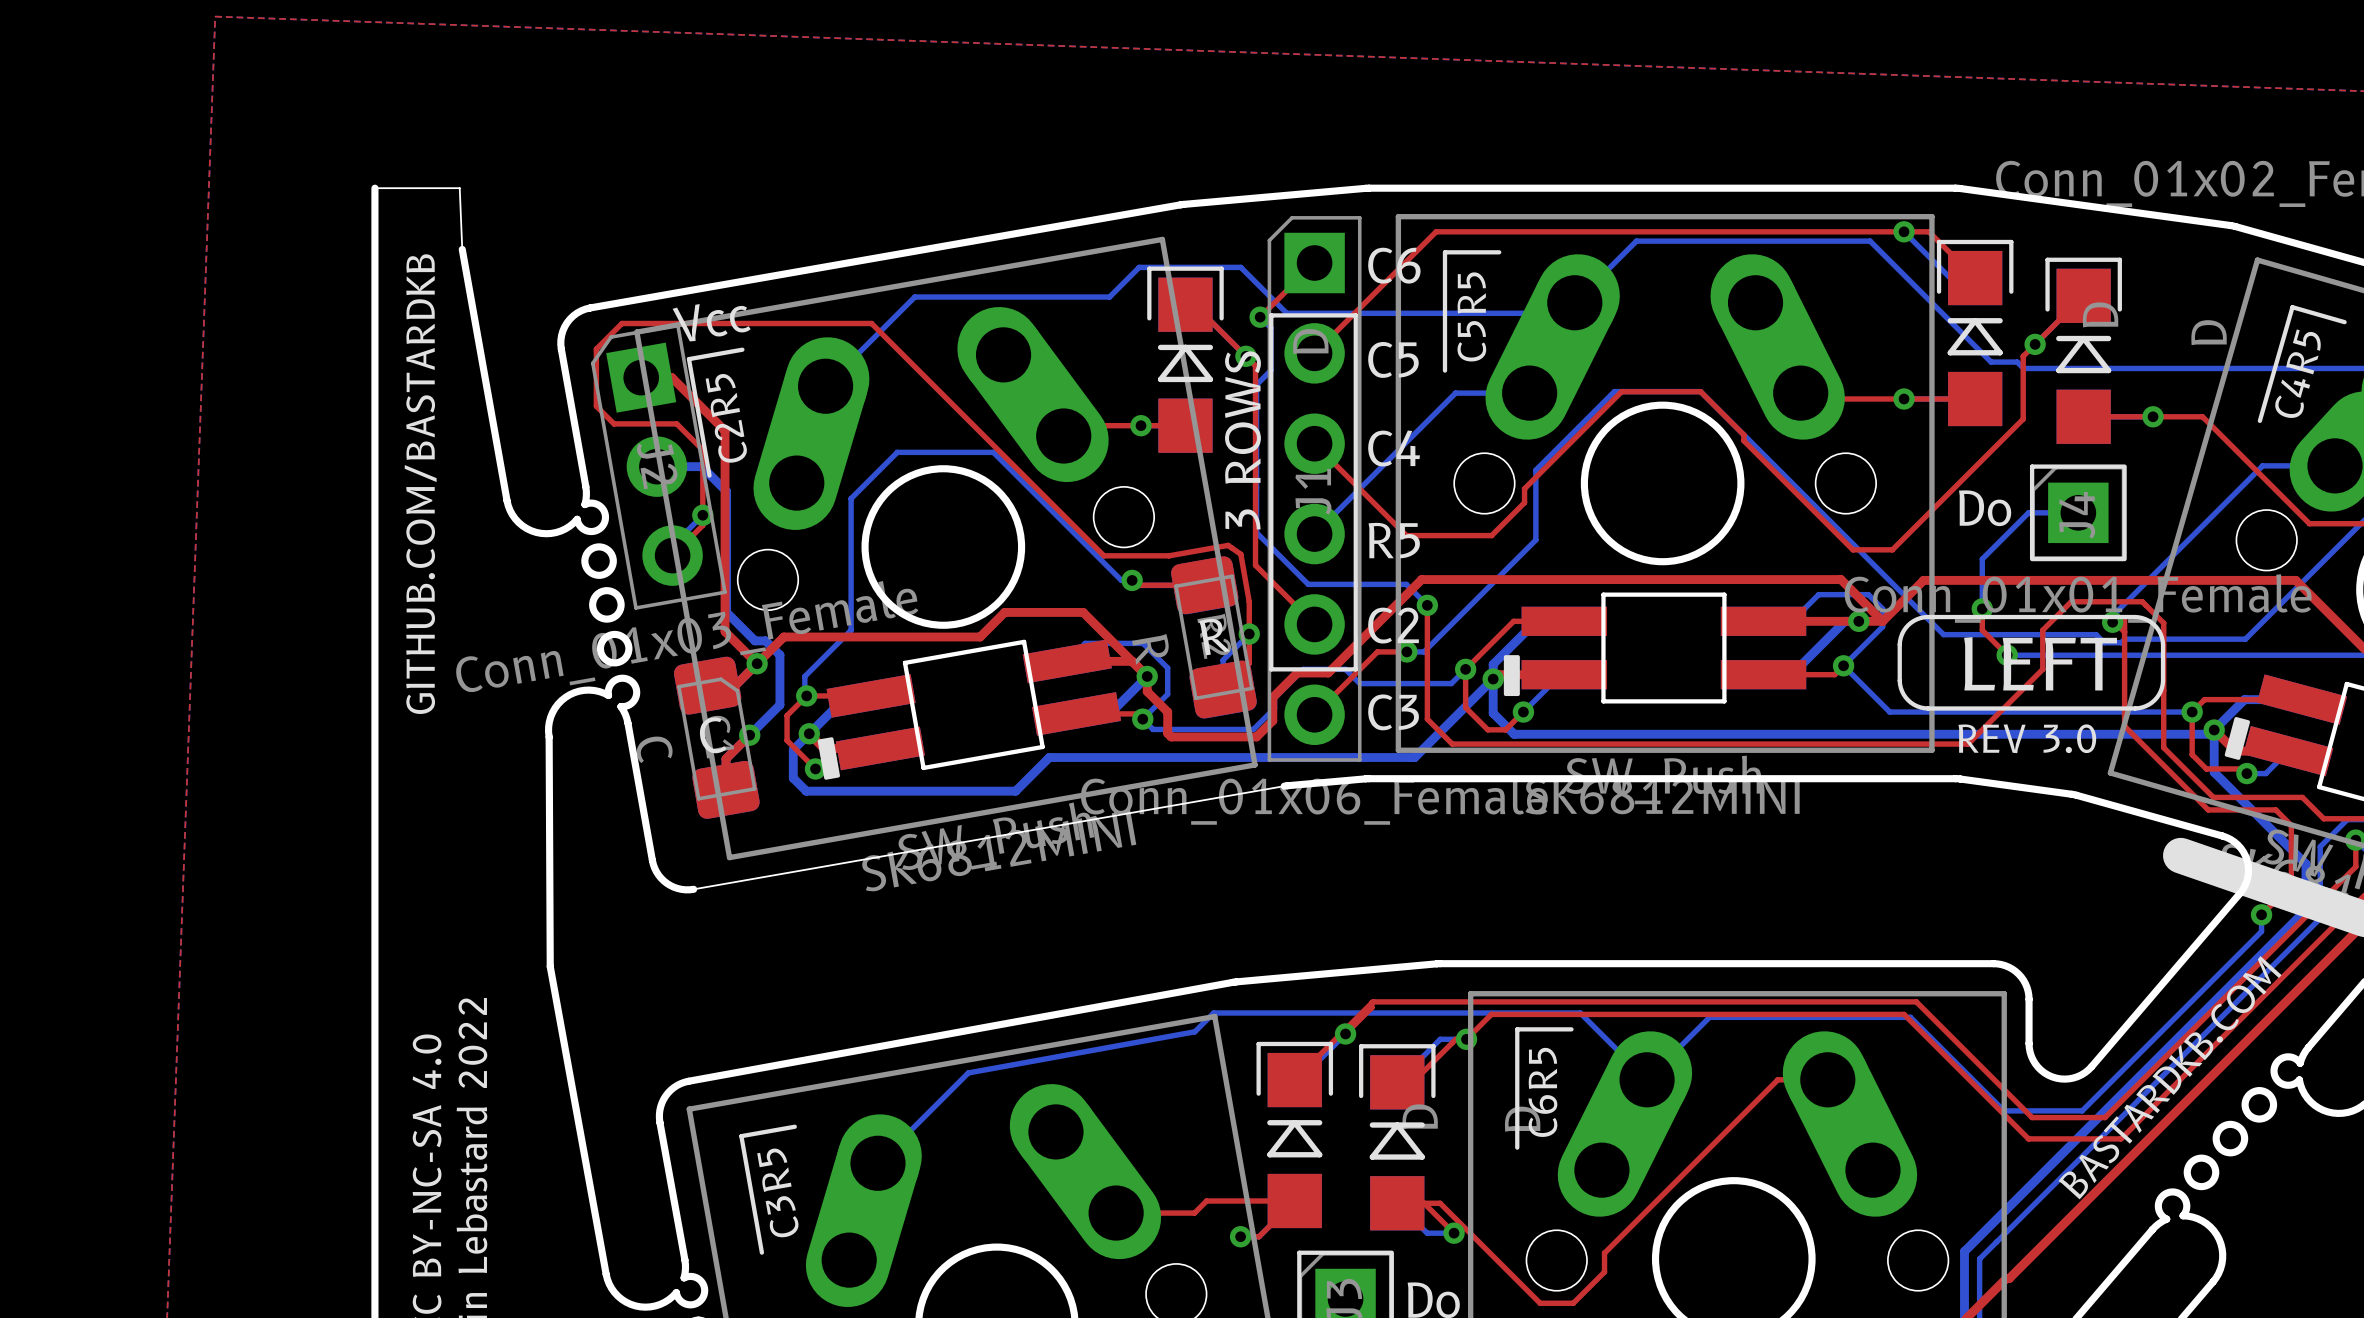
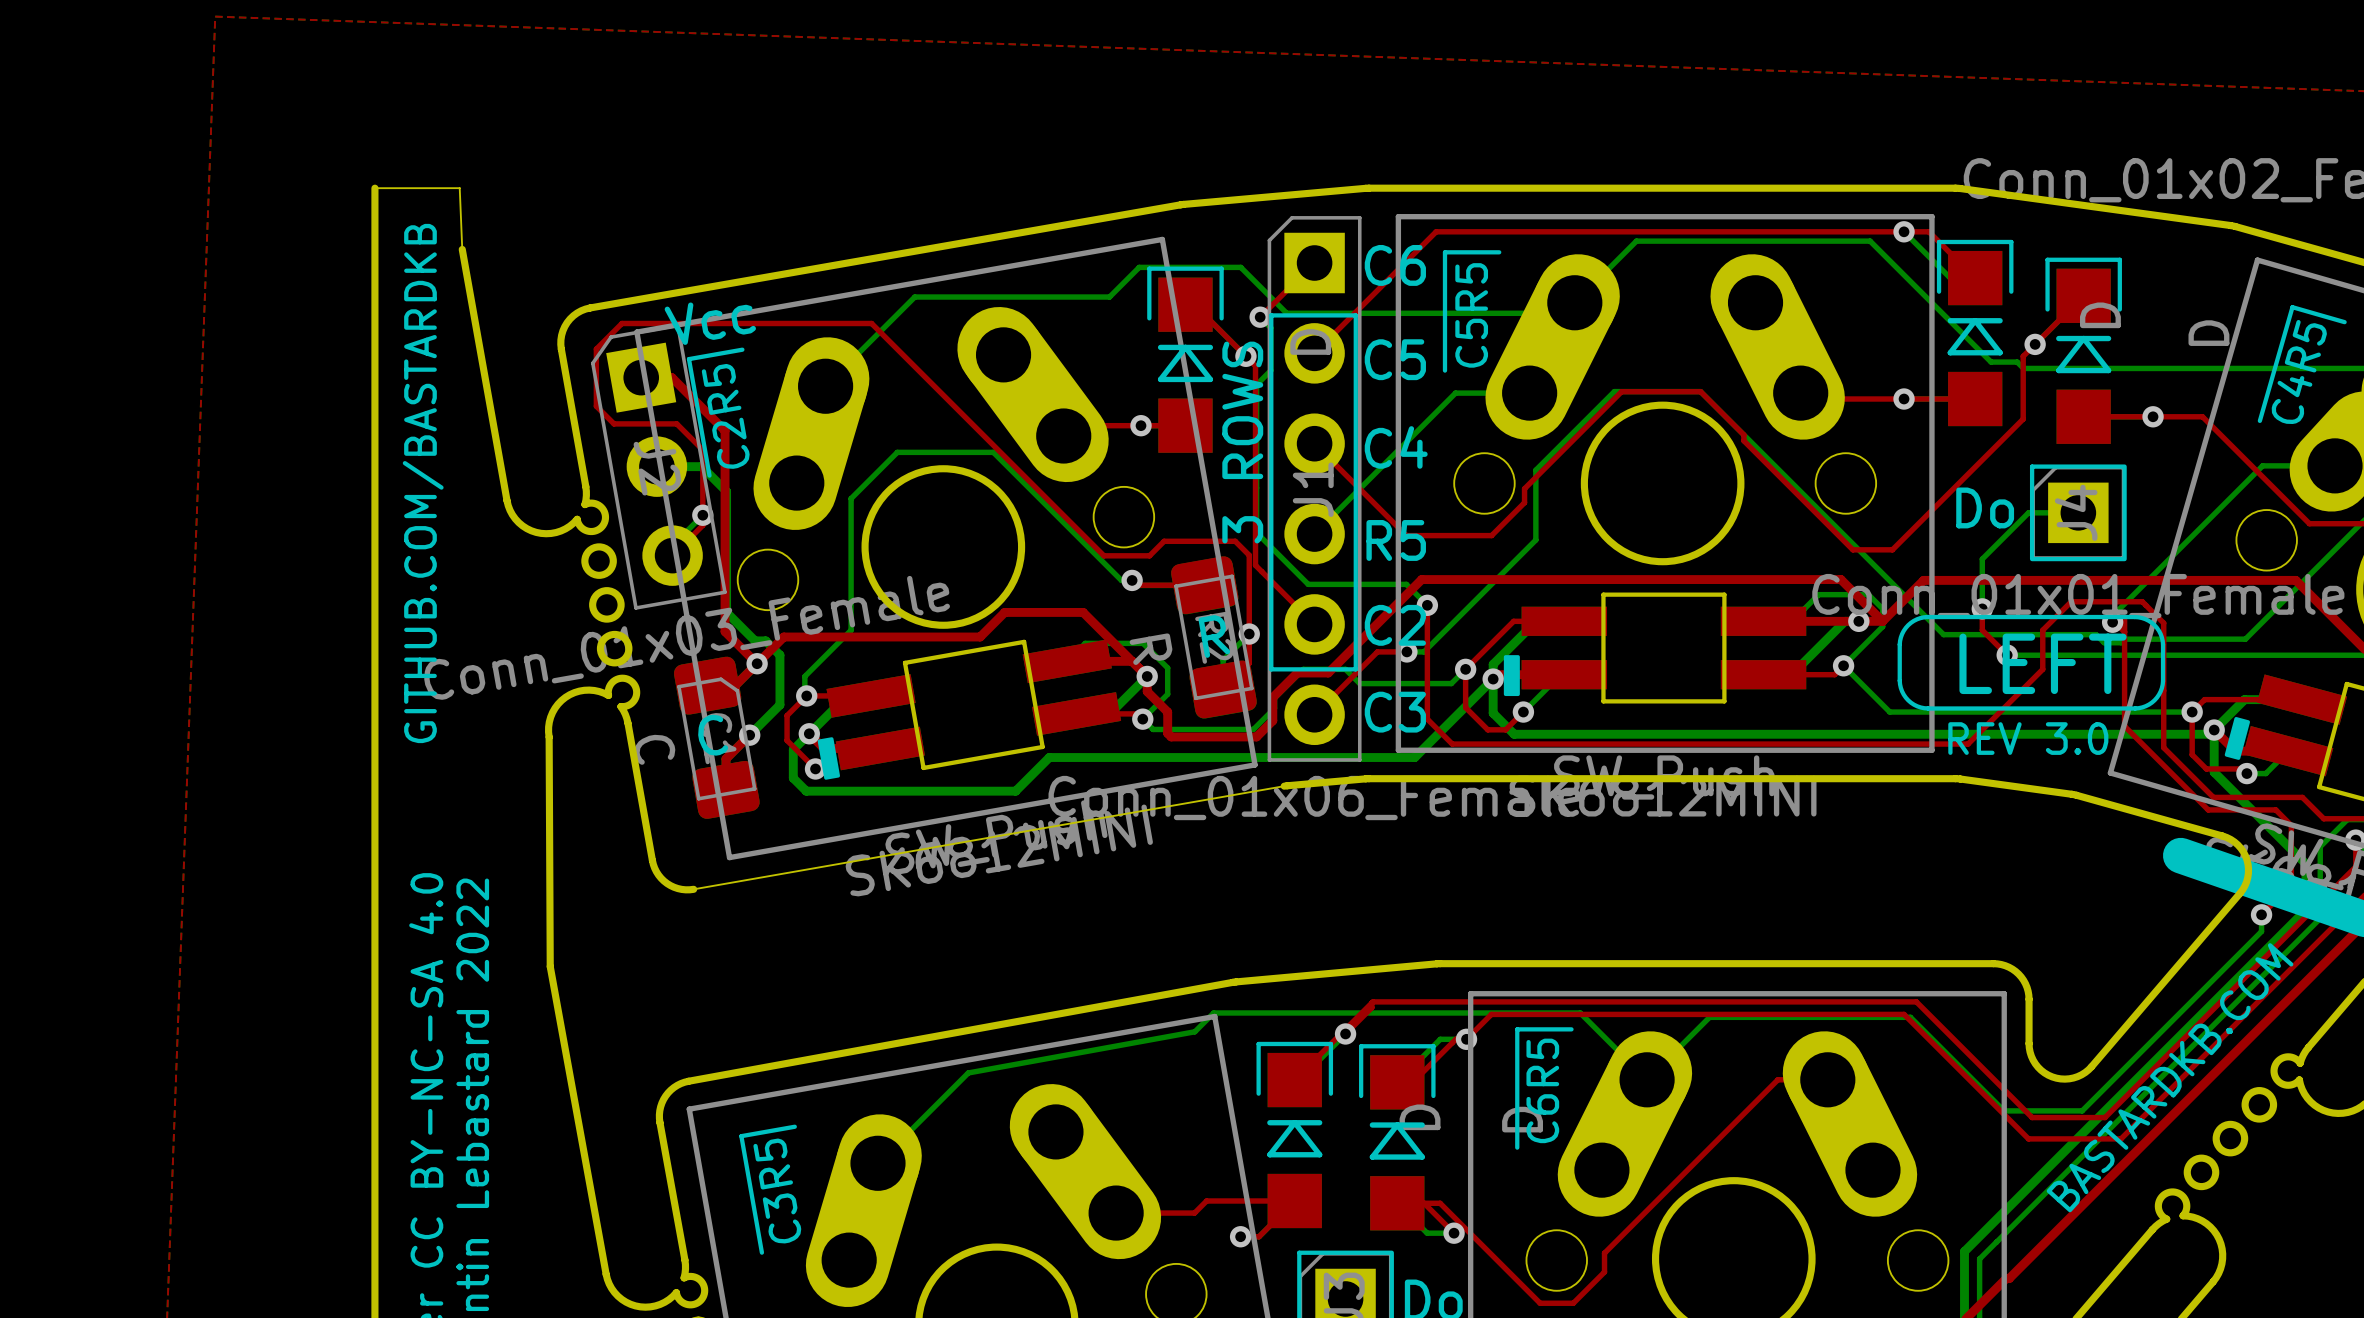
top track: (1149, 555) (1169, 555) (1228, 545) (1240, 554) (1249, 601) -> (1149, 555) (1164, 541) (1235, 541) (1249, 555) (1249, 601)

